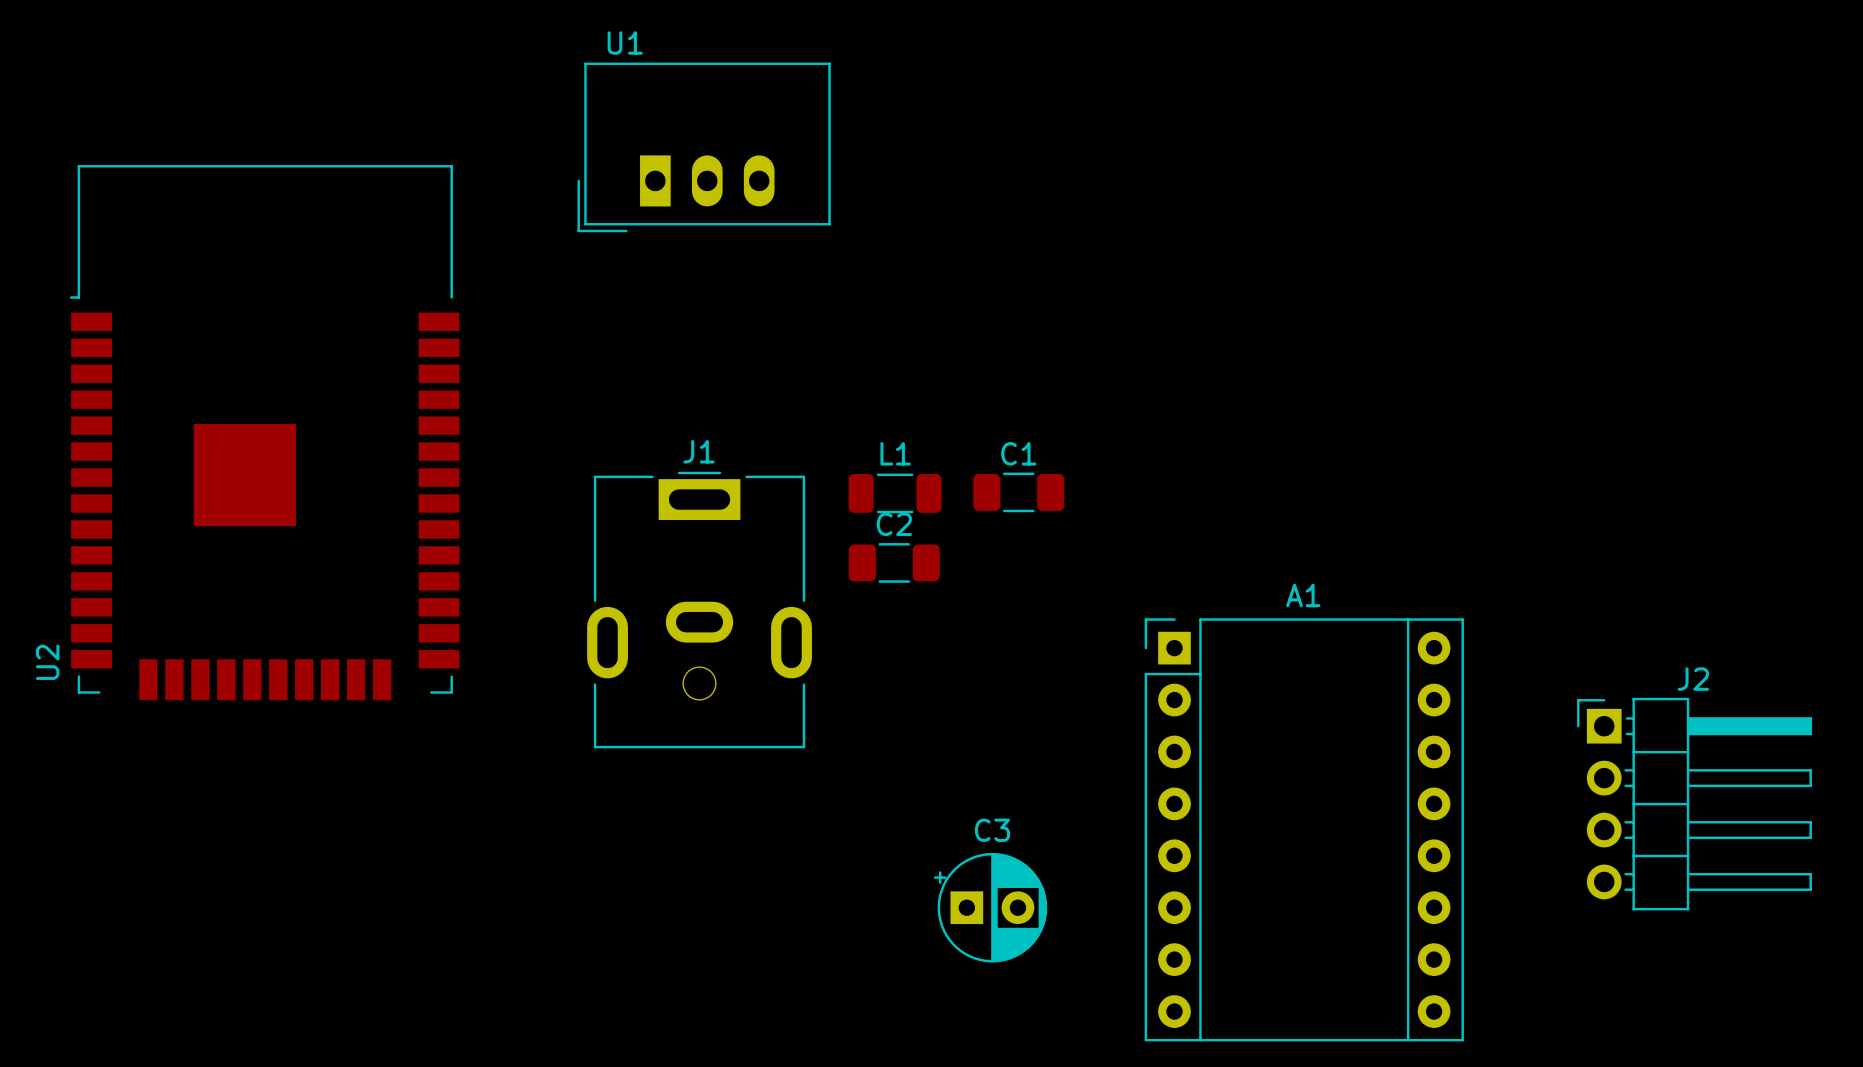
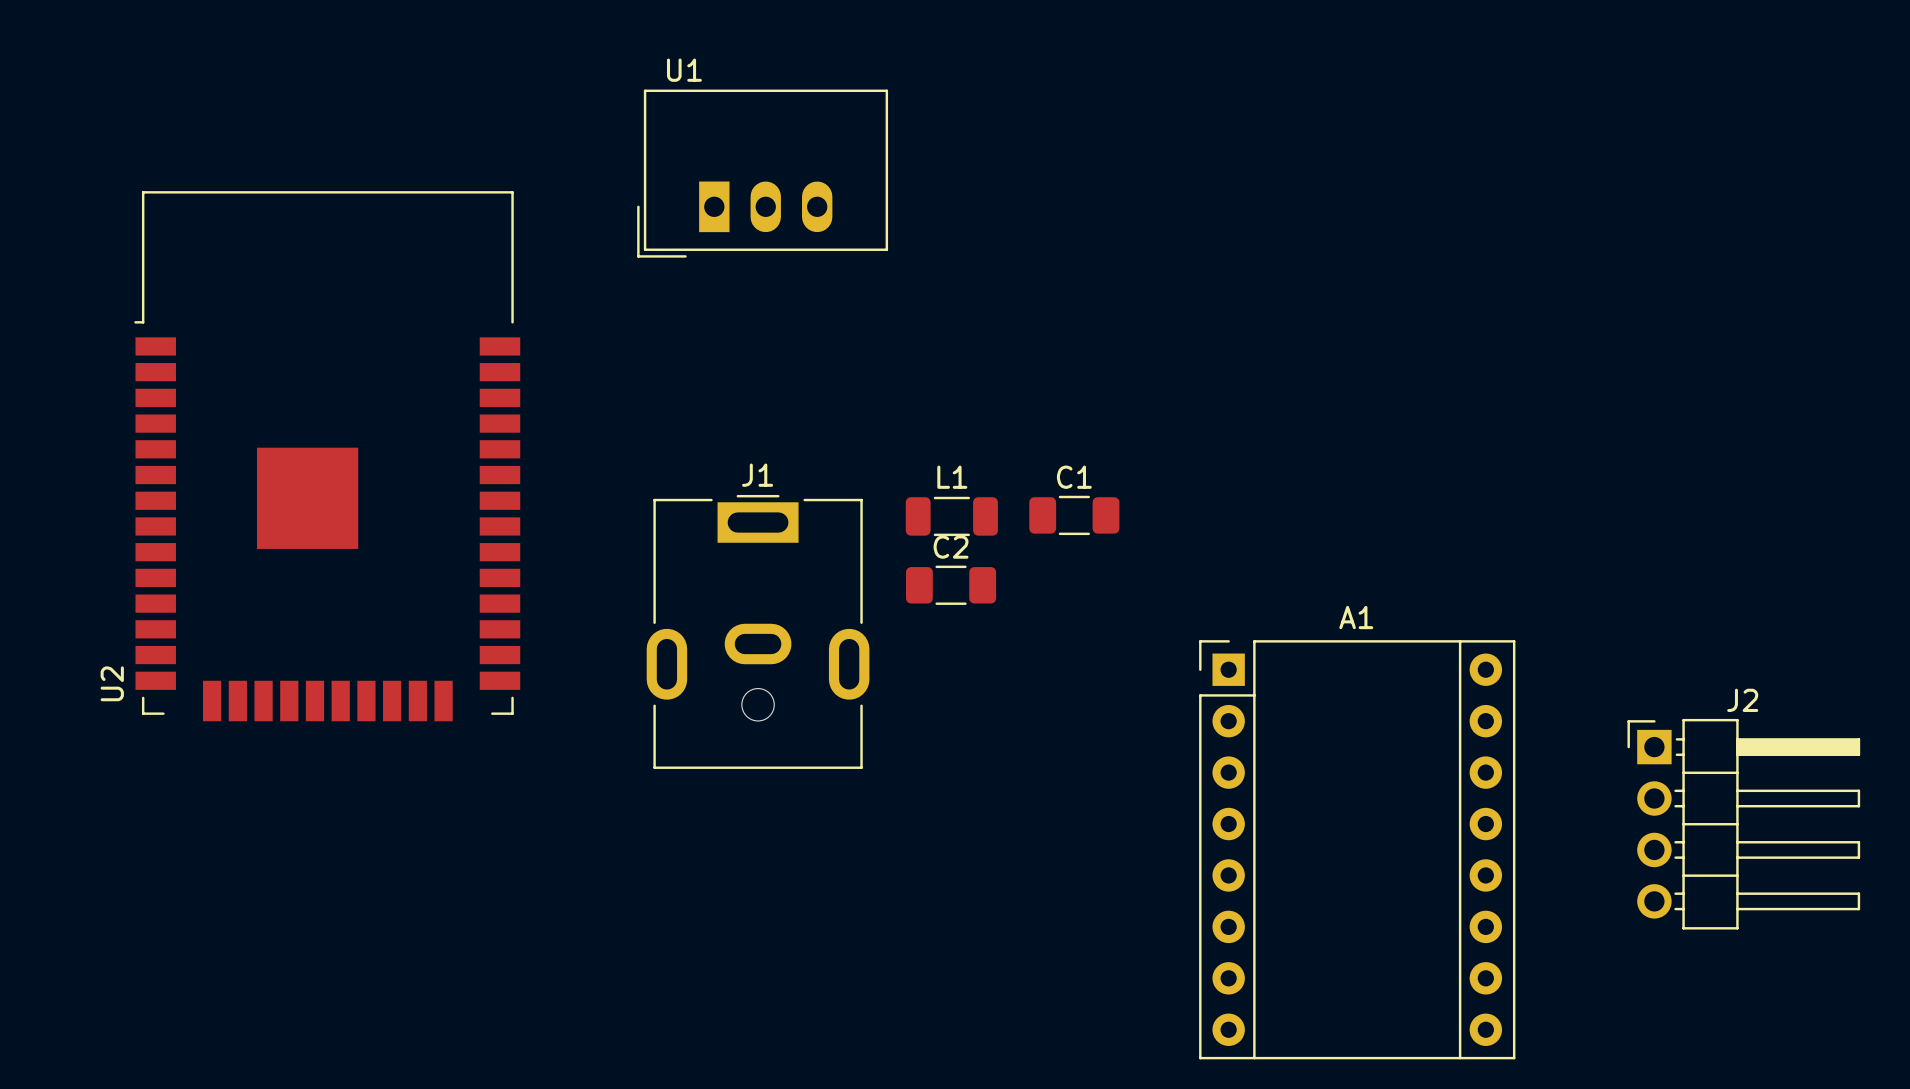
C3: (990, 907) -> none

